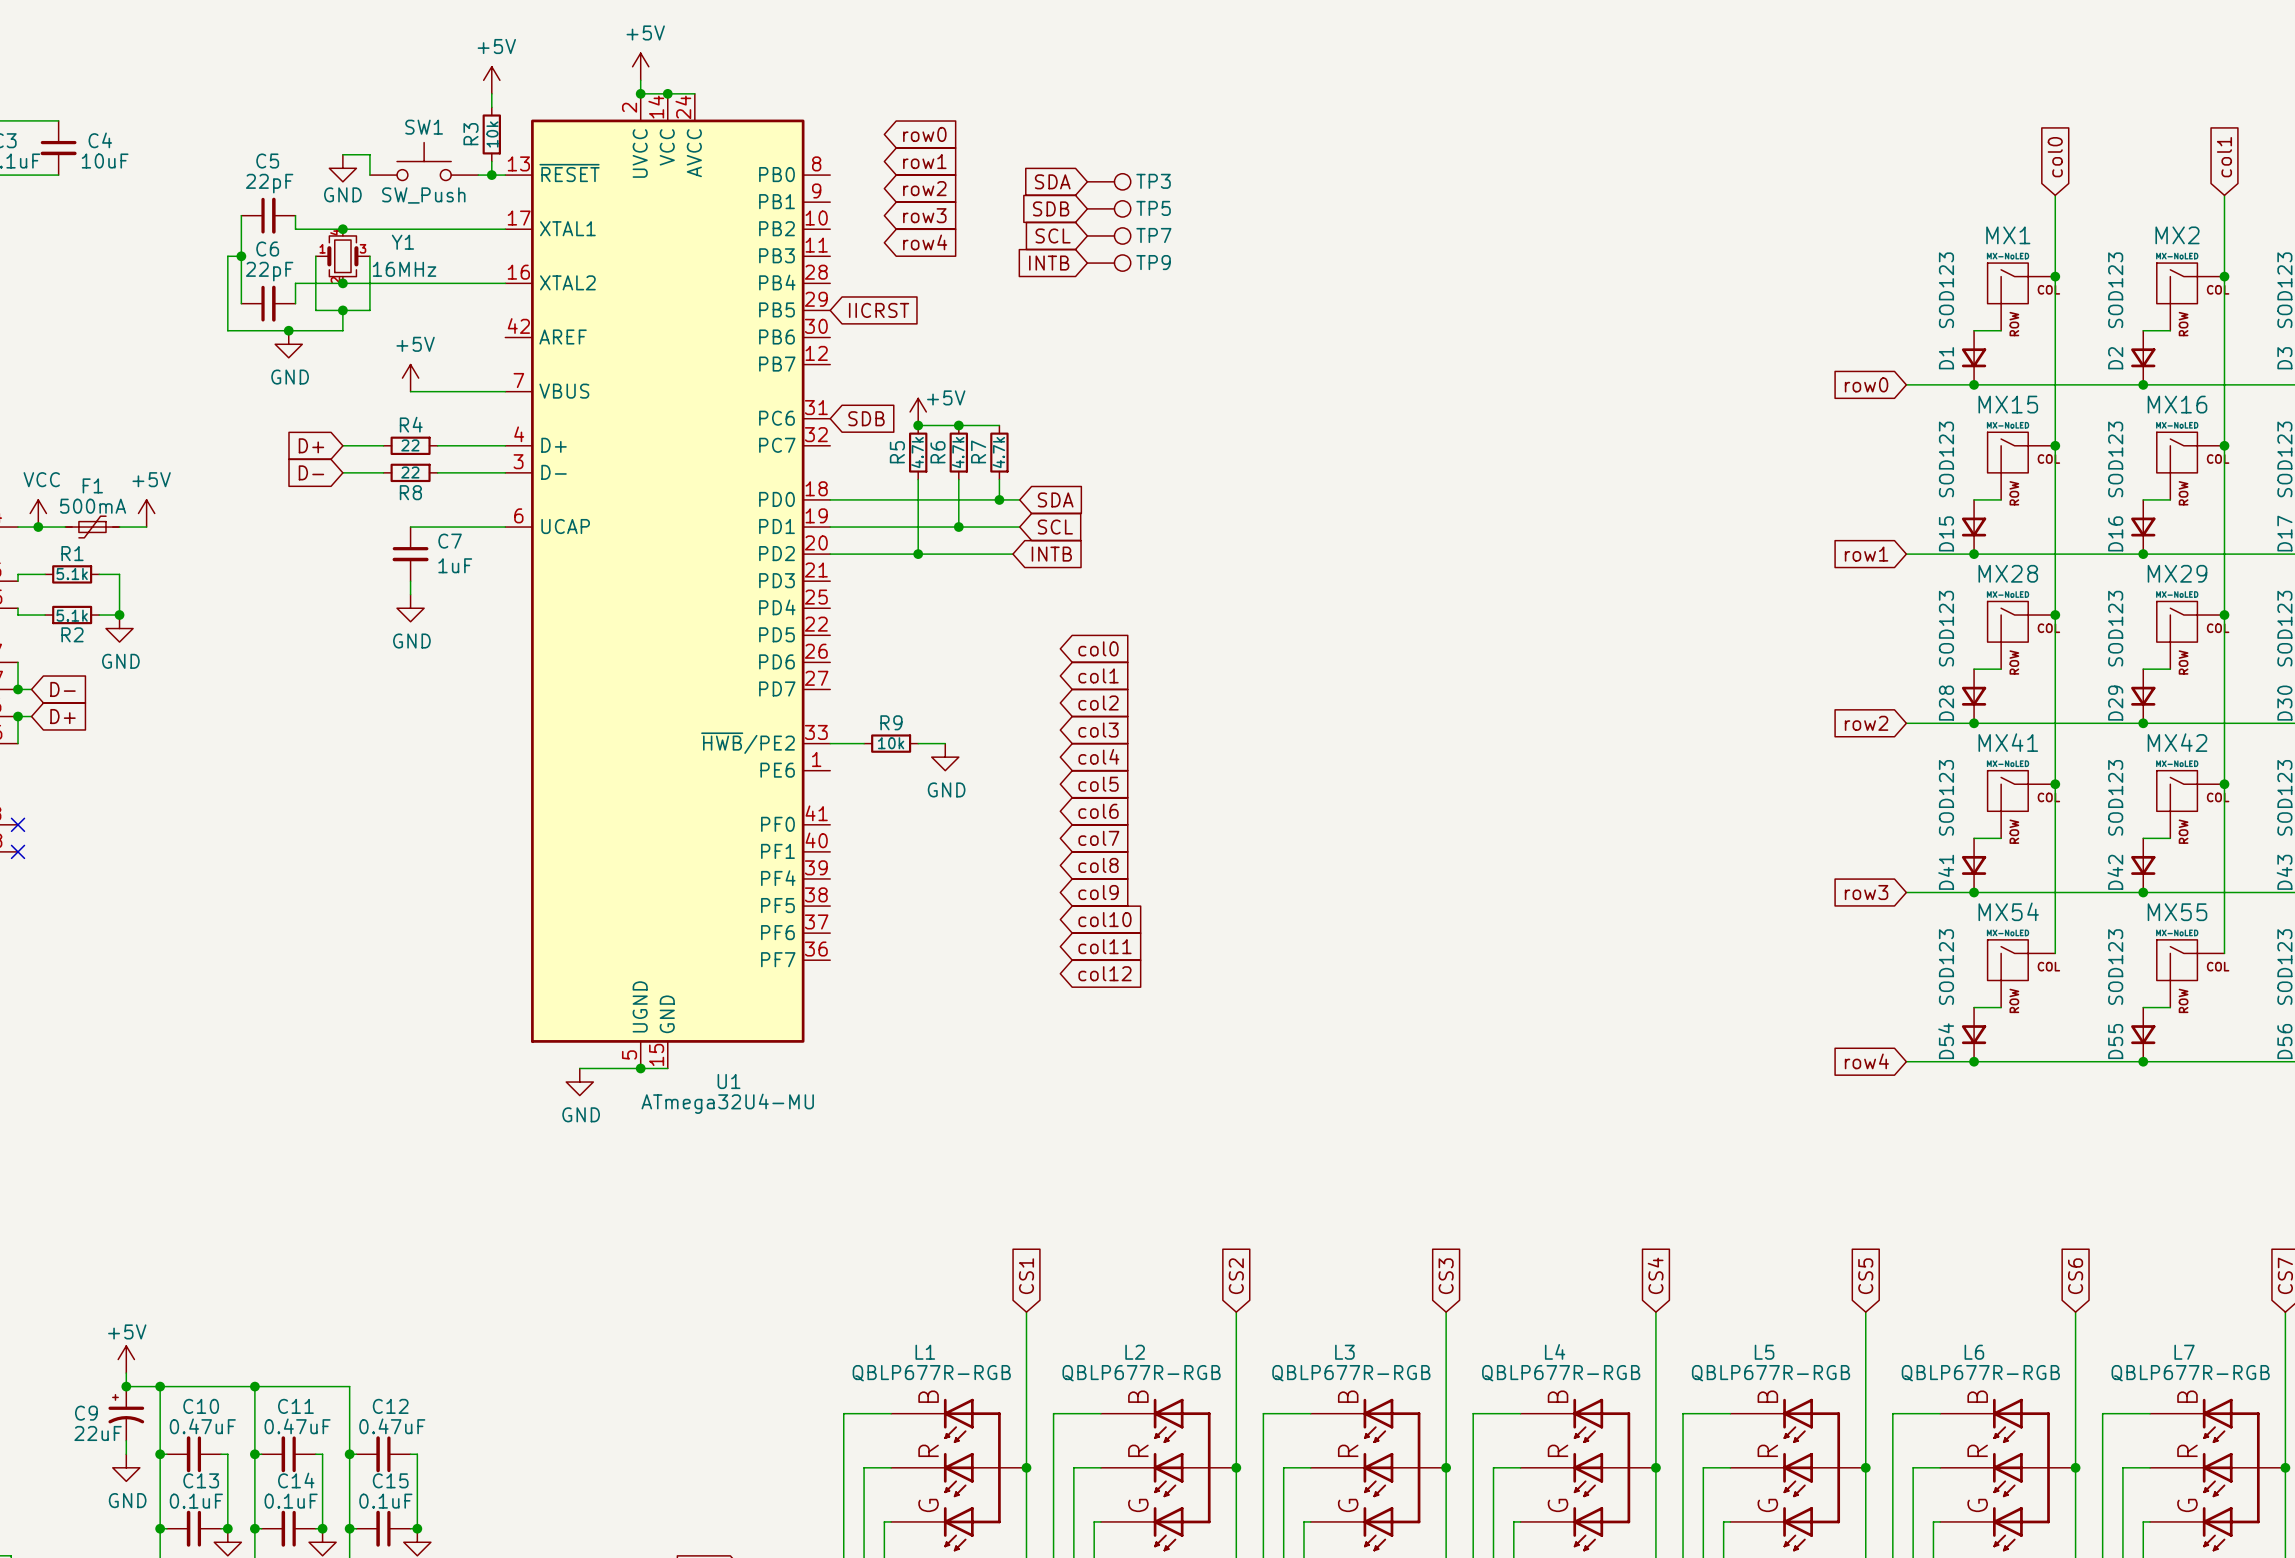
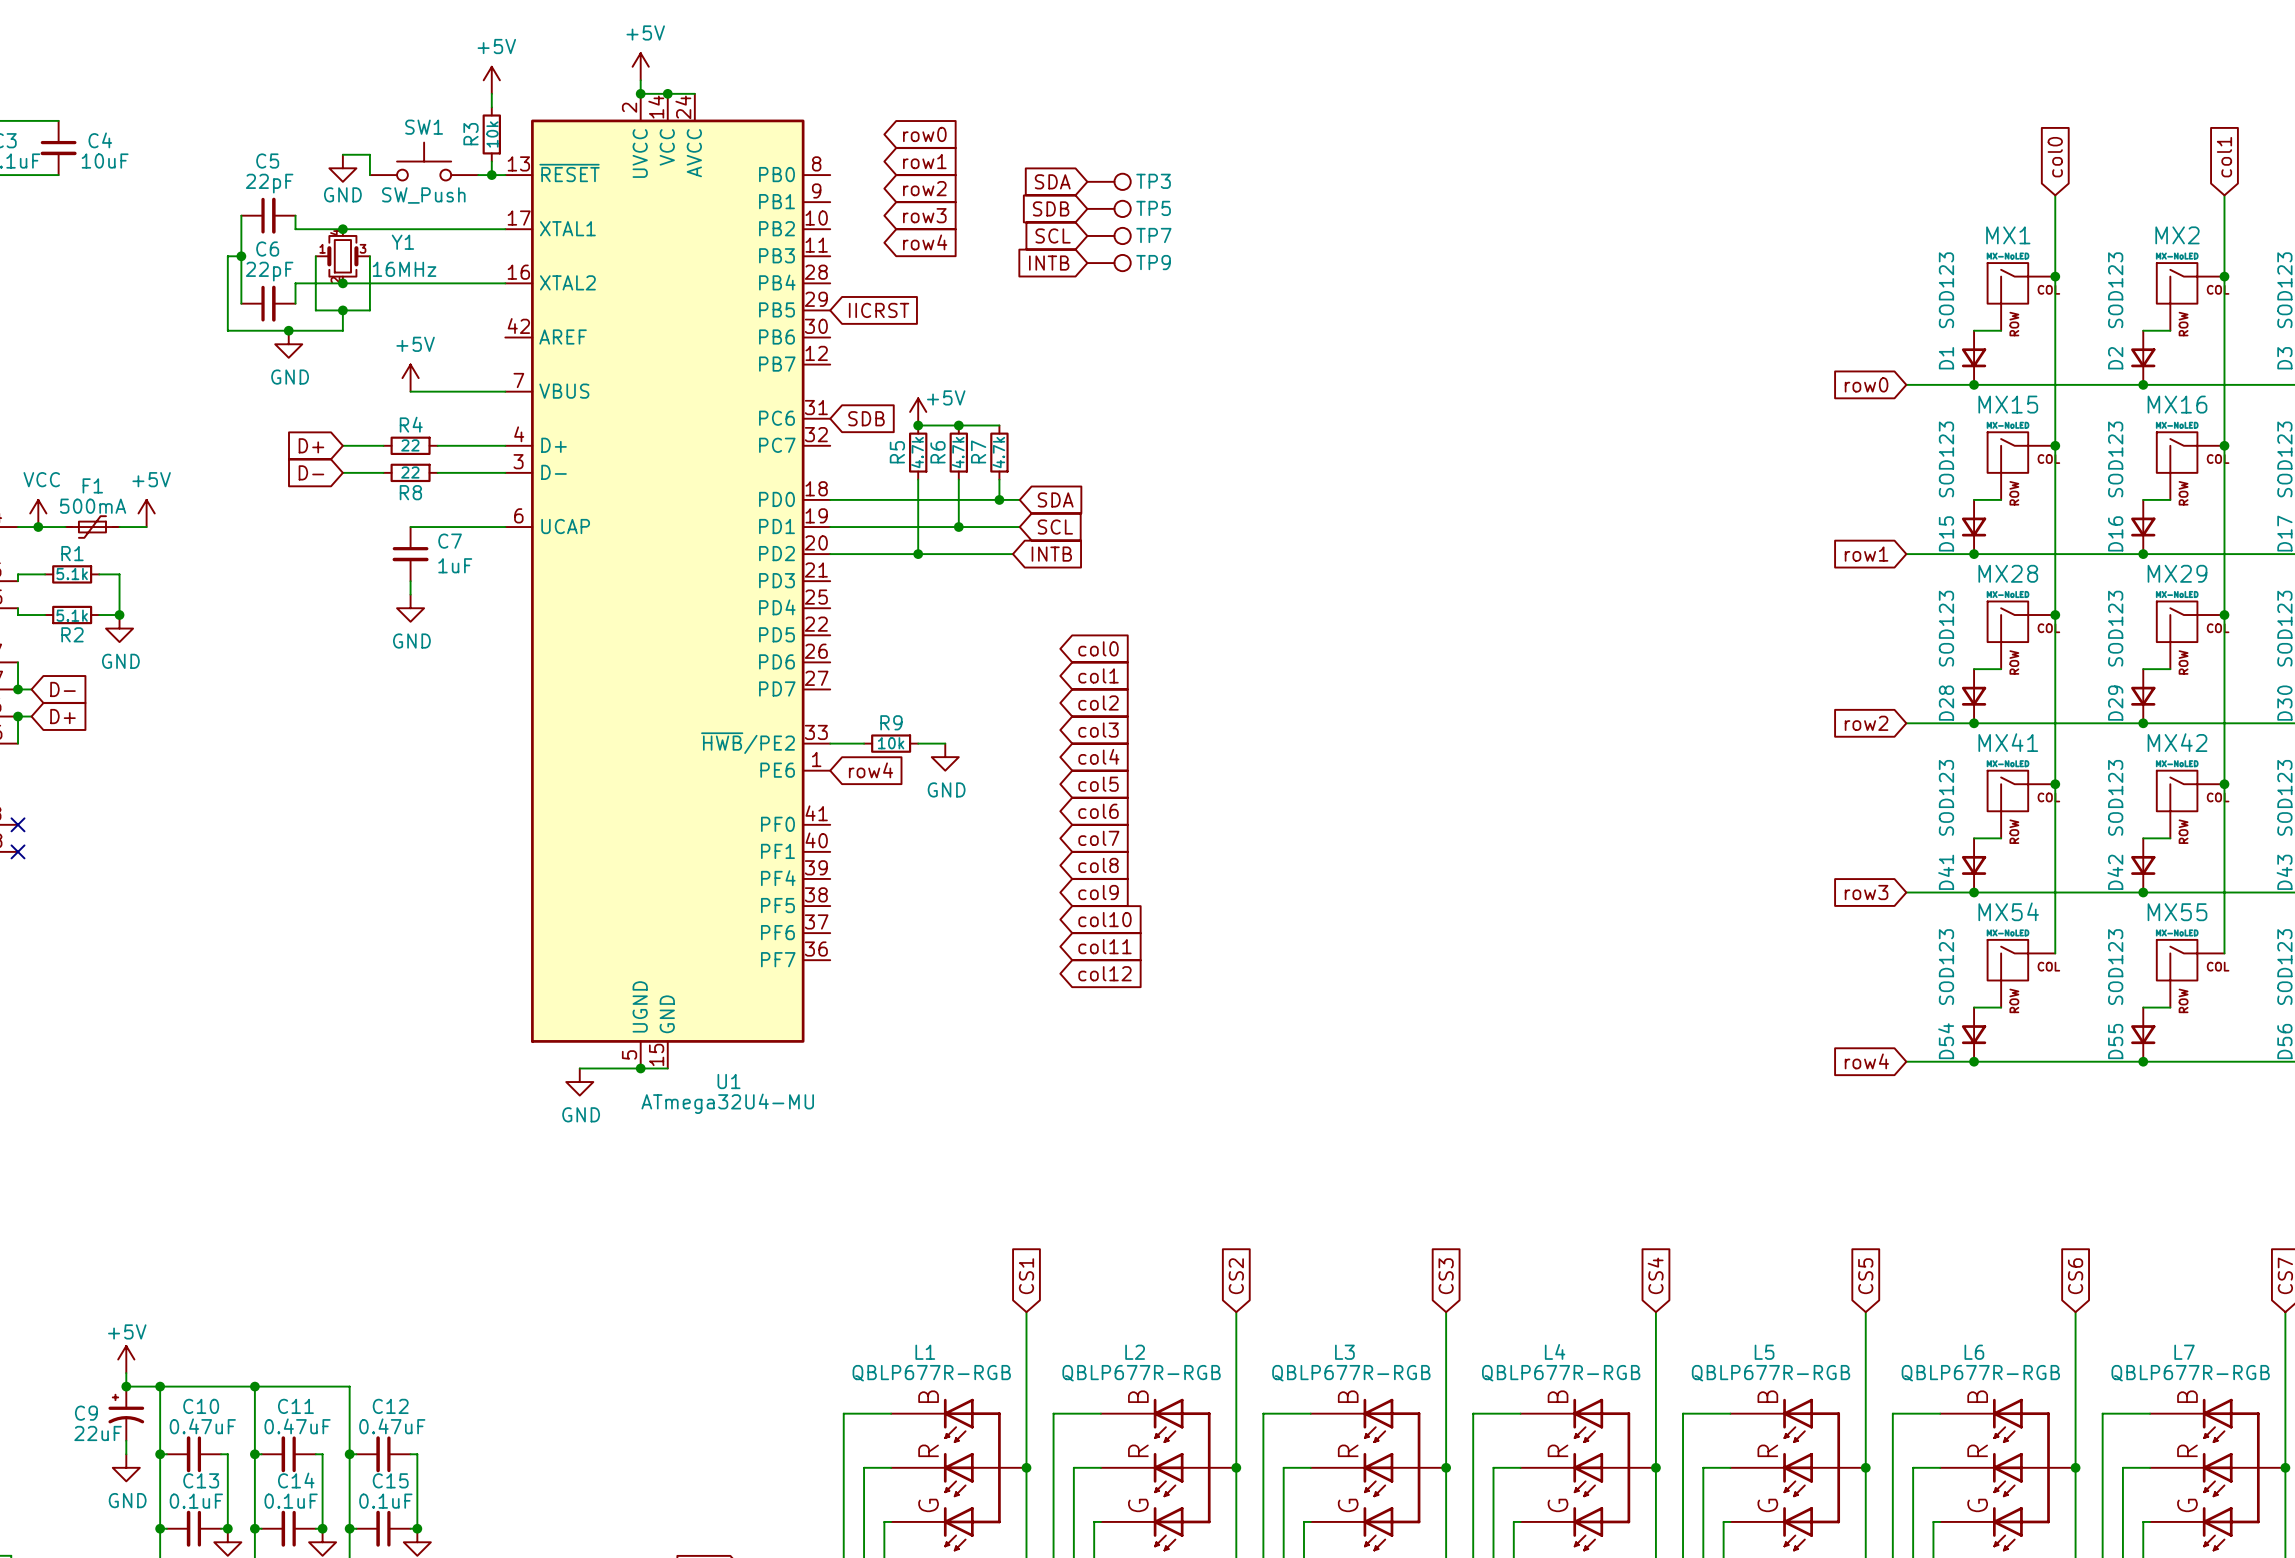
global label: none -> row4 (871, 770)

